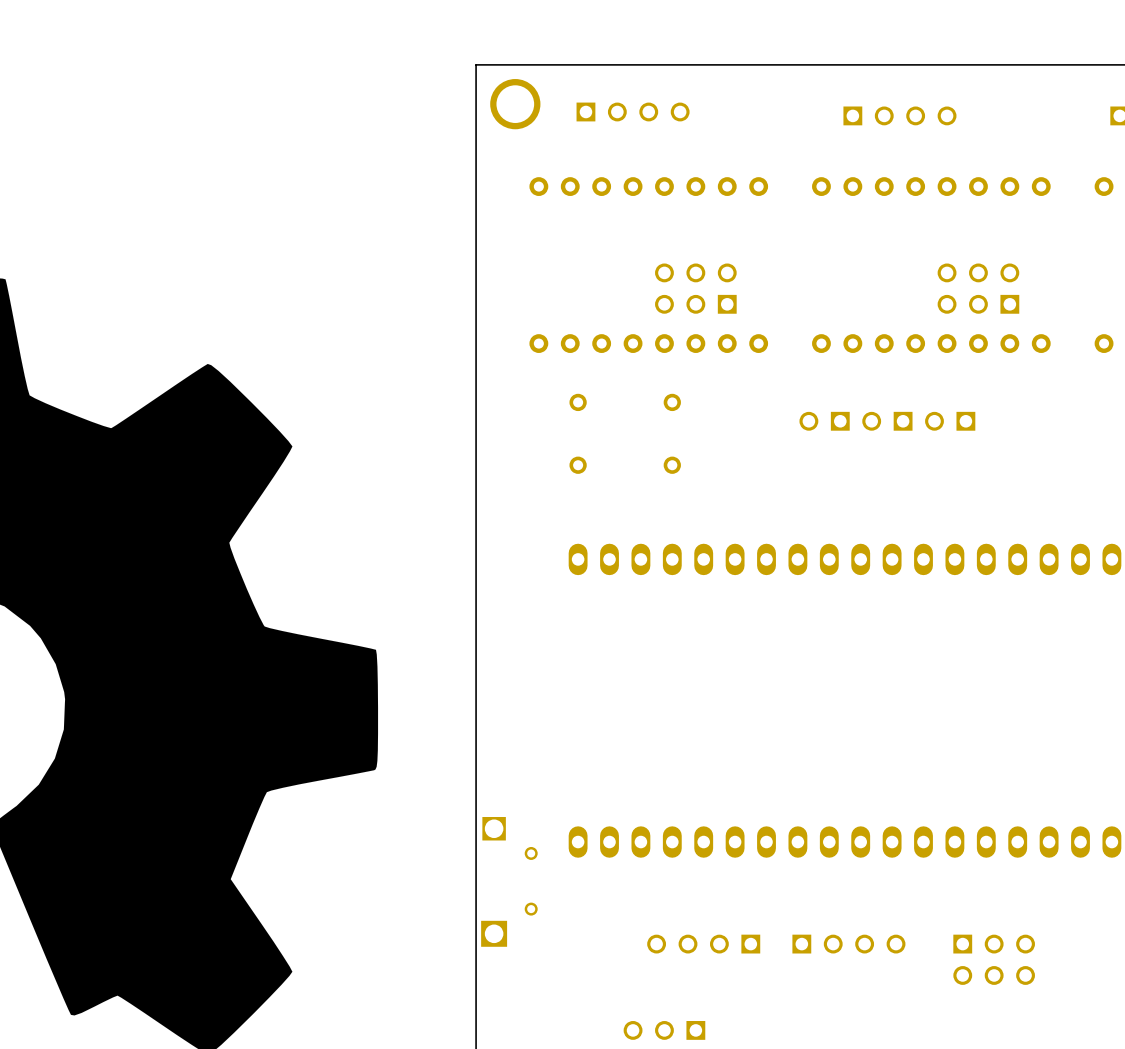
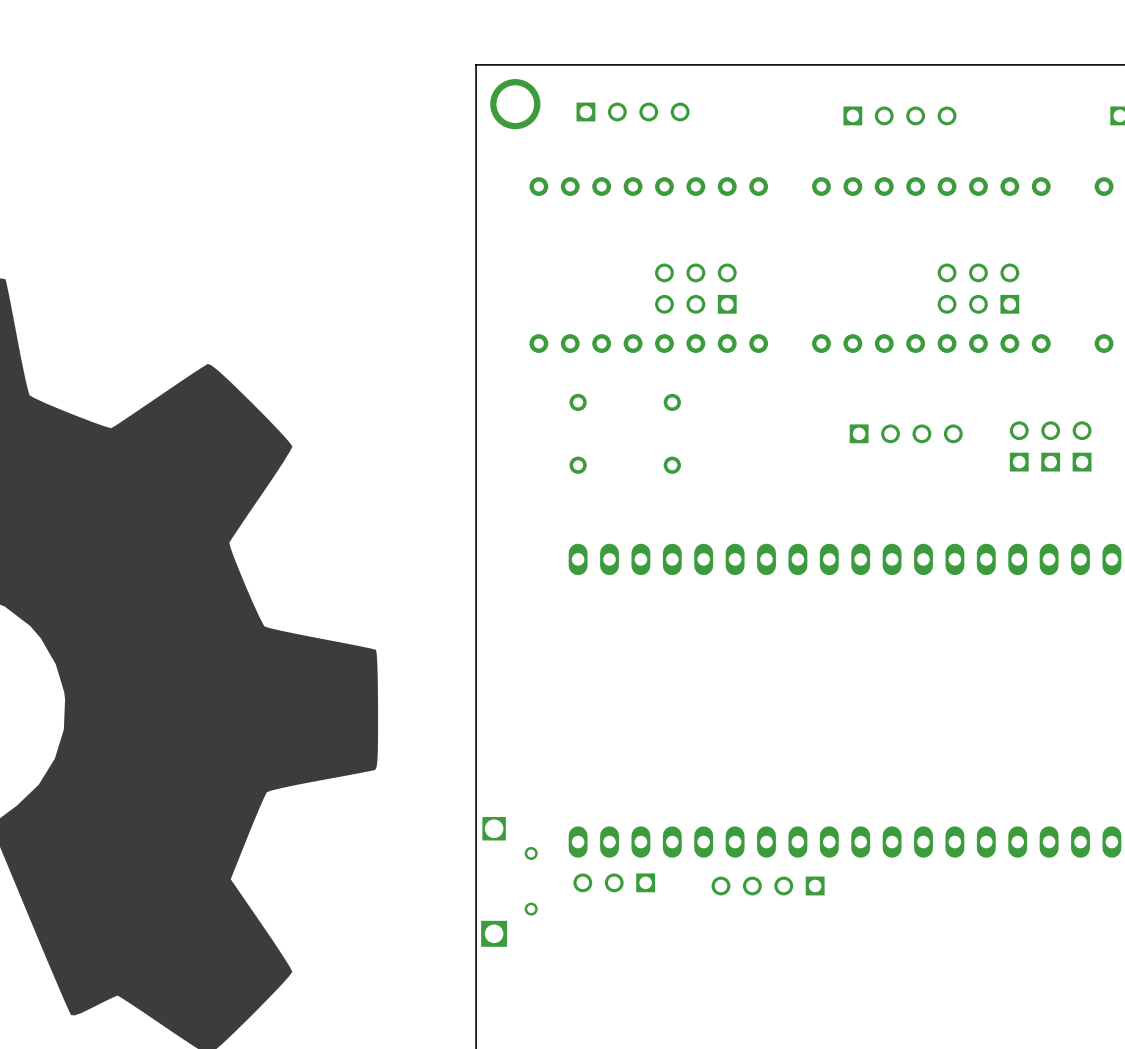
part: (824, 421) -> none
part: (887, 421) -> none
part: (950, 421) -> none
part: none -> (906, 433)
part: none -> (1019, 446)
part: none -> (1050, 446)
part: none -> (1082, 446)
part: none -> (768, 885)
part: (703, 944) -> none
part: (848, 944) -> none
part: (994, 959) -> none
part position: (664, 1030) -> (614, 882)

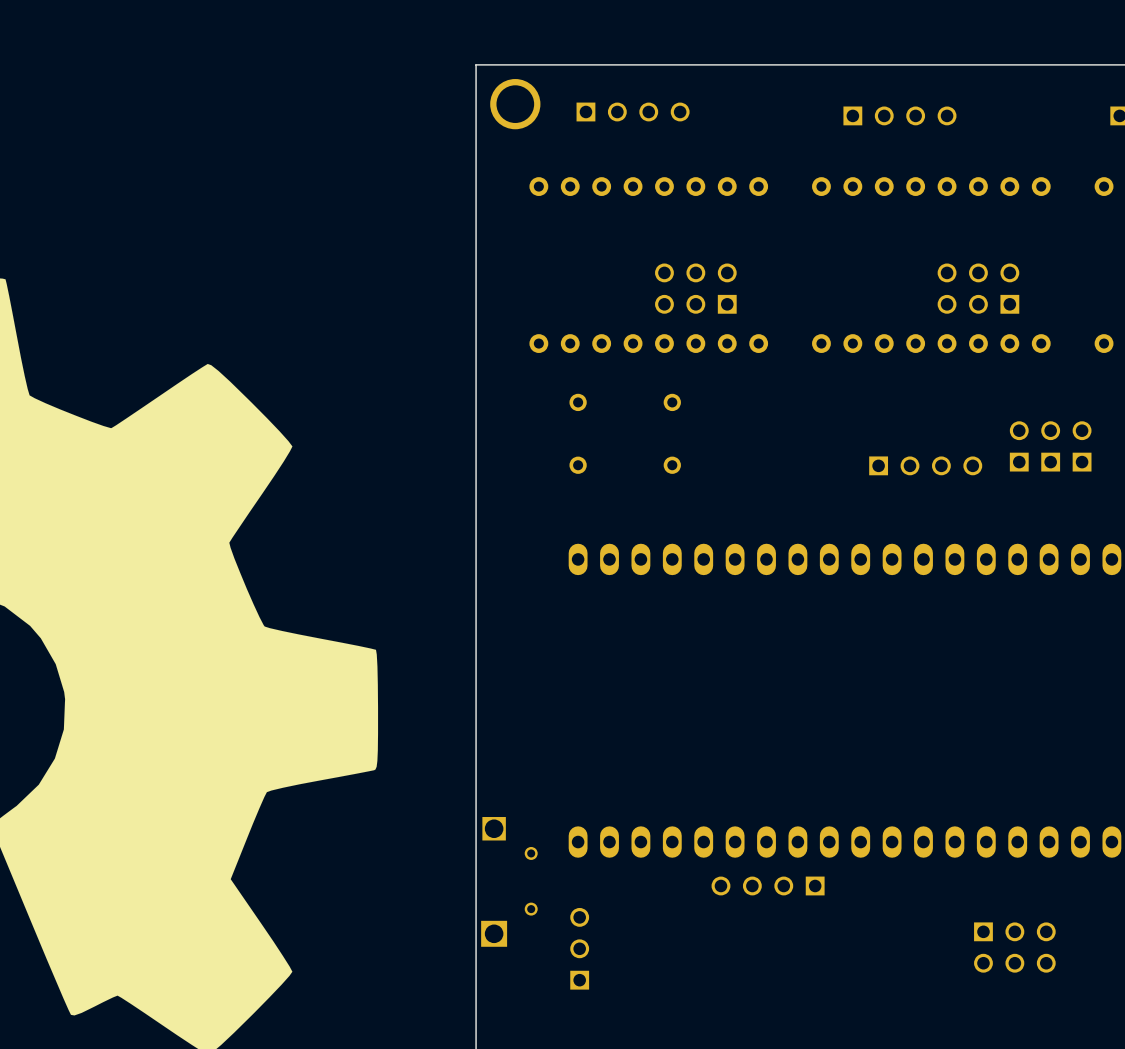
part position: (906, 433) -> (925, 465)
part rotation: 0° (614, 882) -> 90° clockwise (579, 948)
part position: (614, 882) -> (579, 948)
part: none -> (1014, 947)

